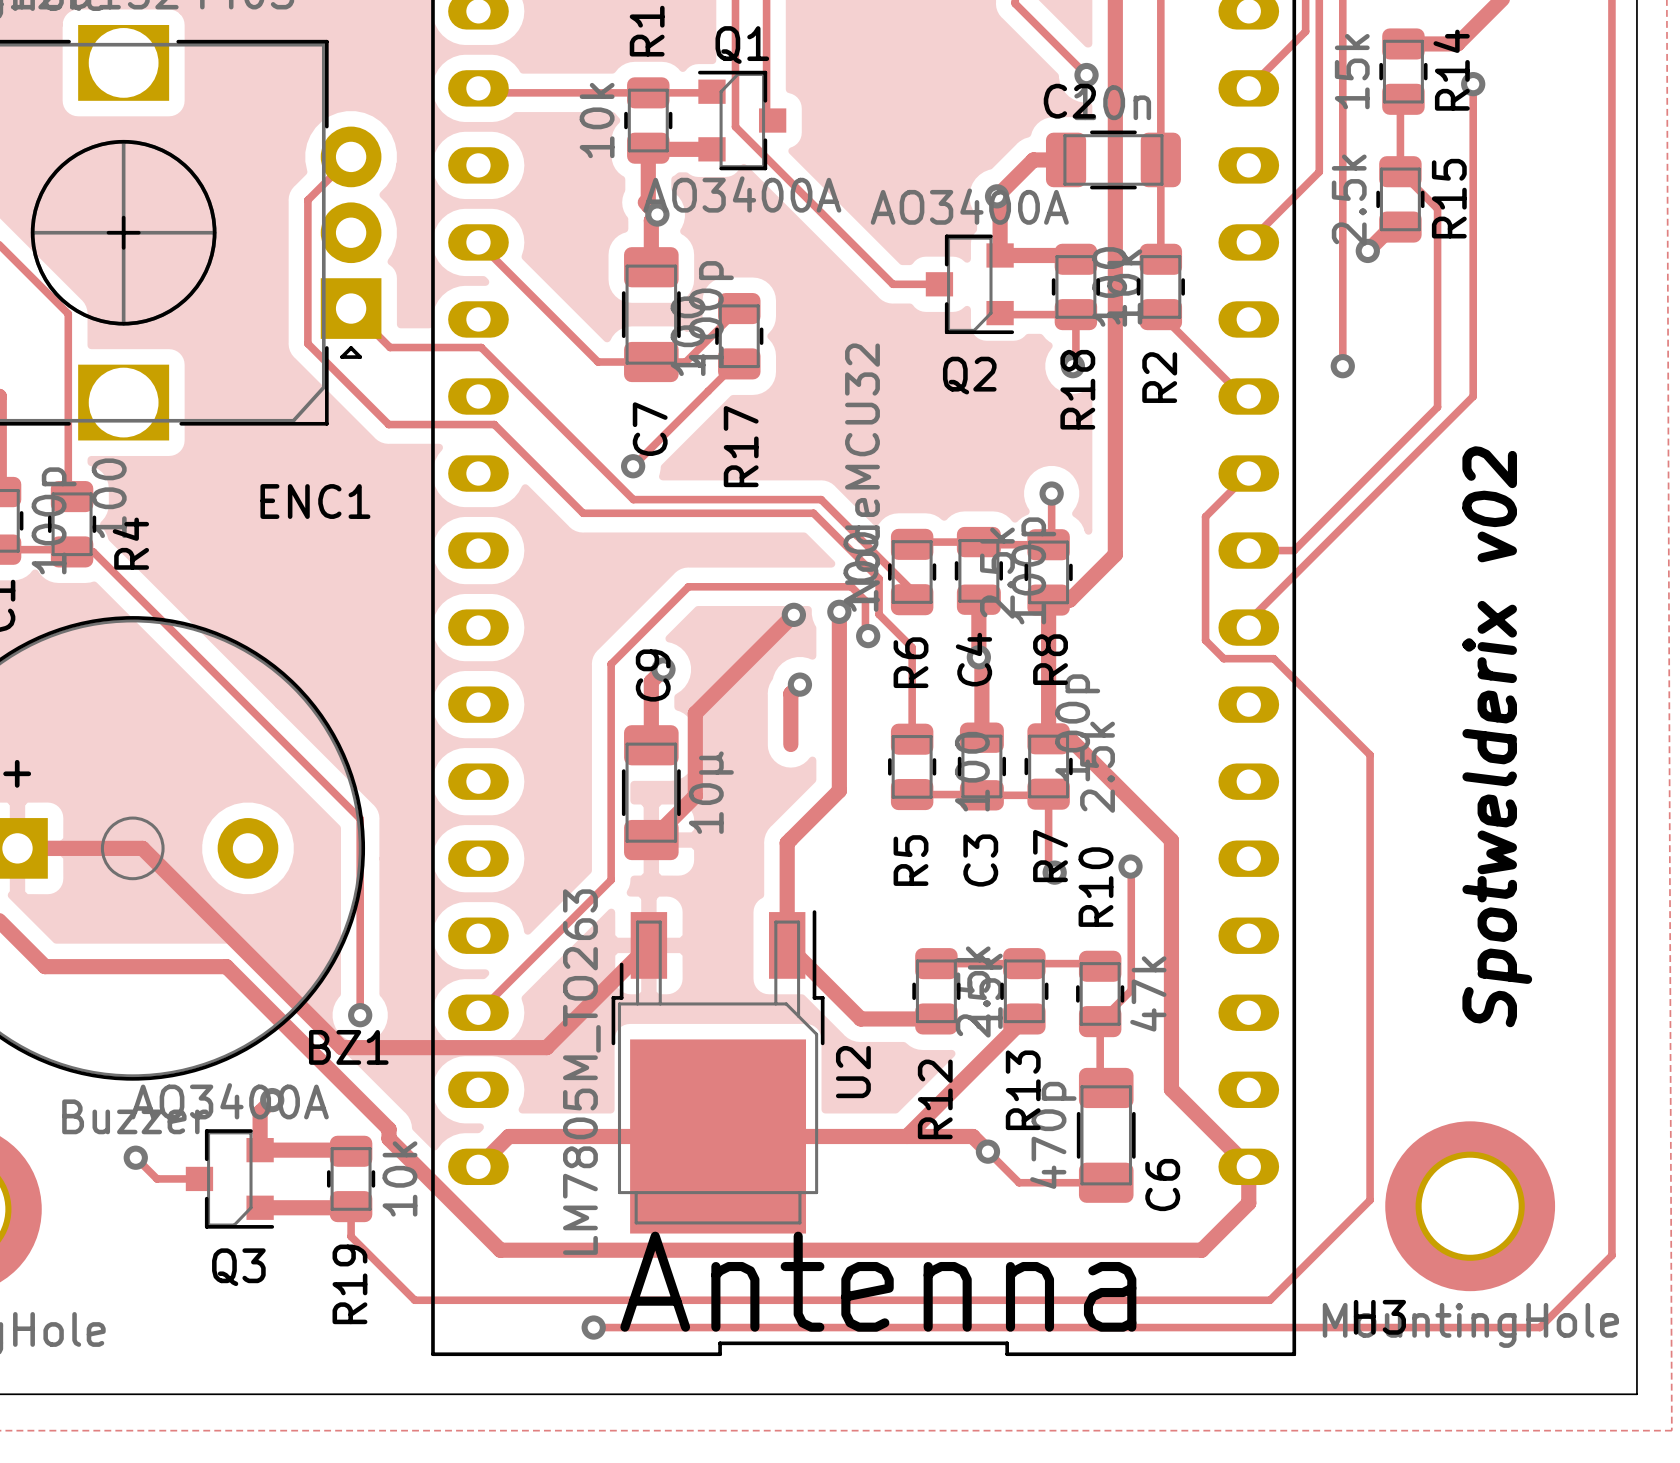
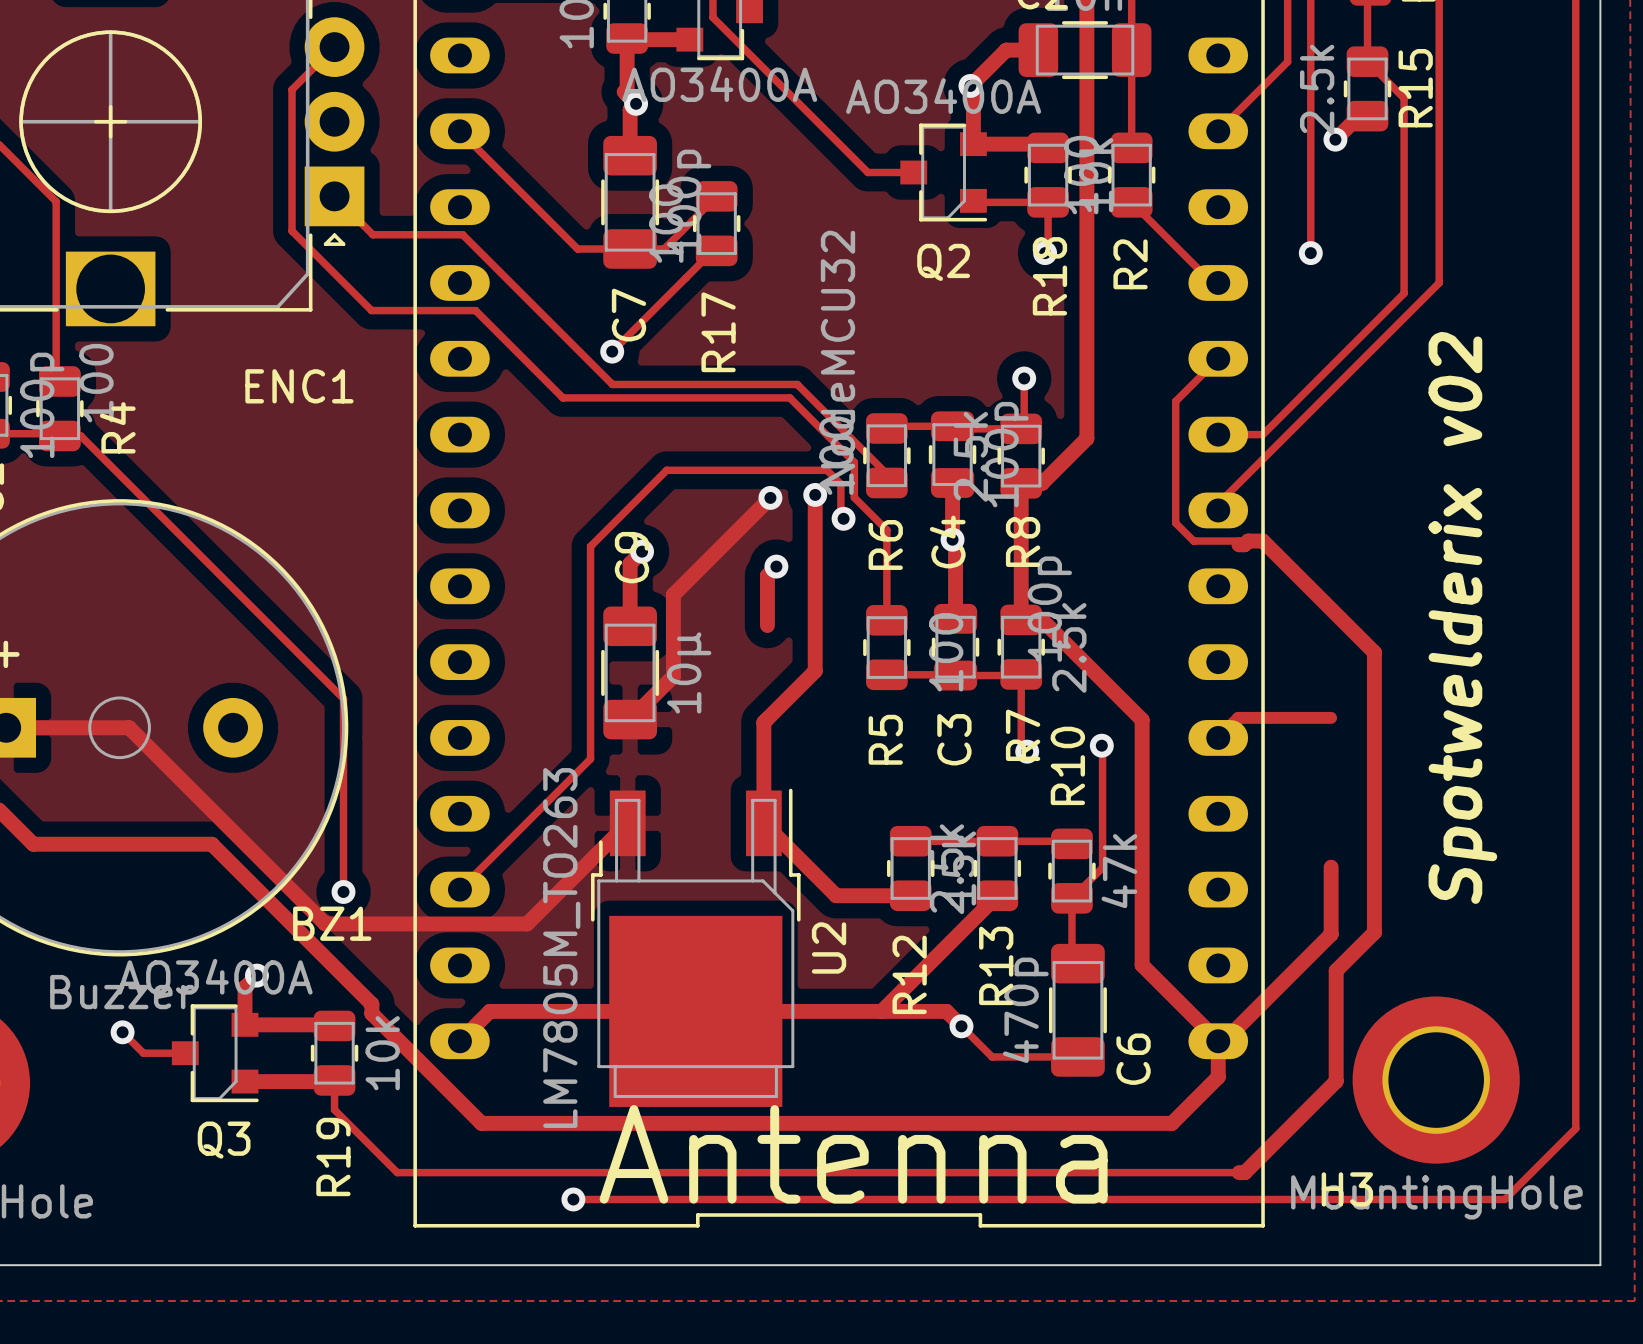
track: (1273, 658) (1370, 754) (1370, 1200) (1270, 1300) -> (1238, 544) (1244, 544) (1248, 541) (1262, 541) (1374, 652) (1374, 932) (1336, 970) (1336, 1081) (1244, 1172) (1239, 1172)
track: none -> (1331, 717) (1238, 717) (1218, 737)
track: none -> (1331, 867) (1331, 934) (1224, 1041) (1218, 1041)

